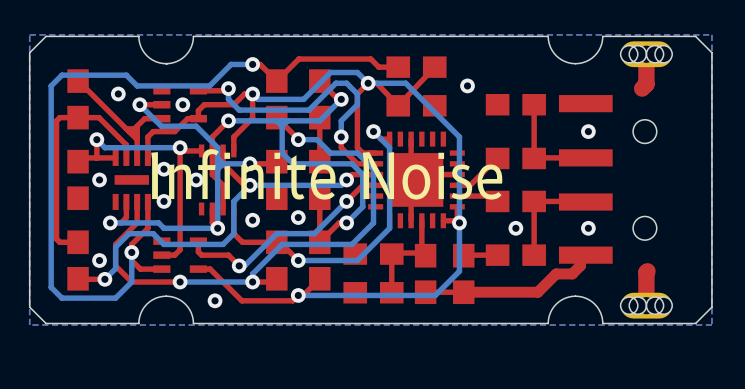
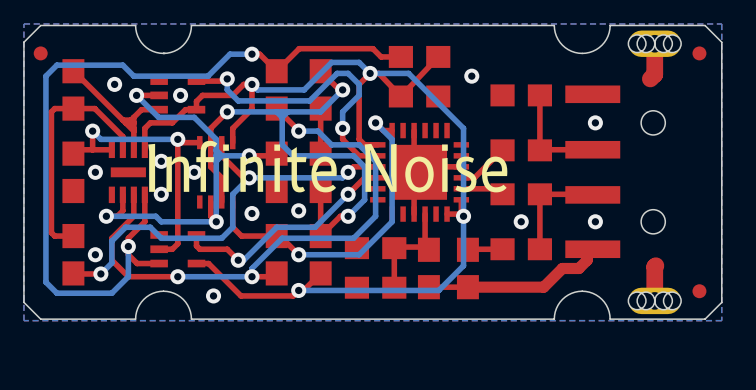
part: none -> (40, 53)
part: none -> (699, 53)
part: none -> (699, 291)

